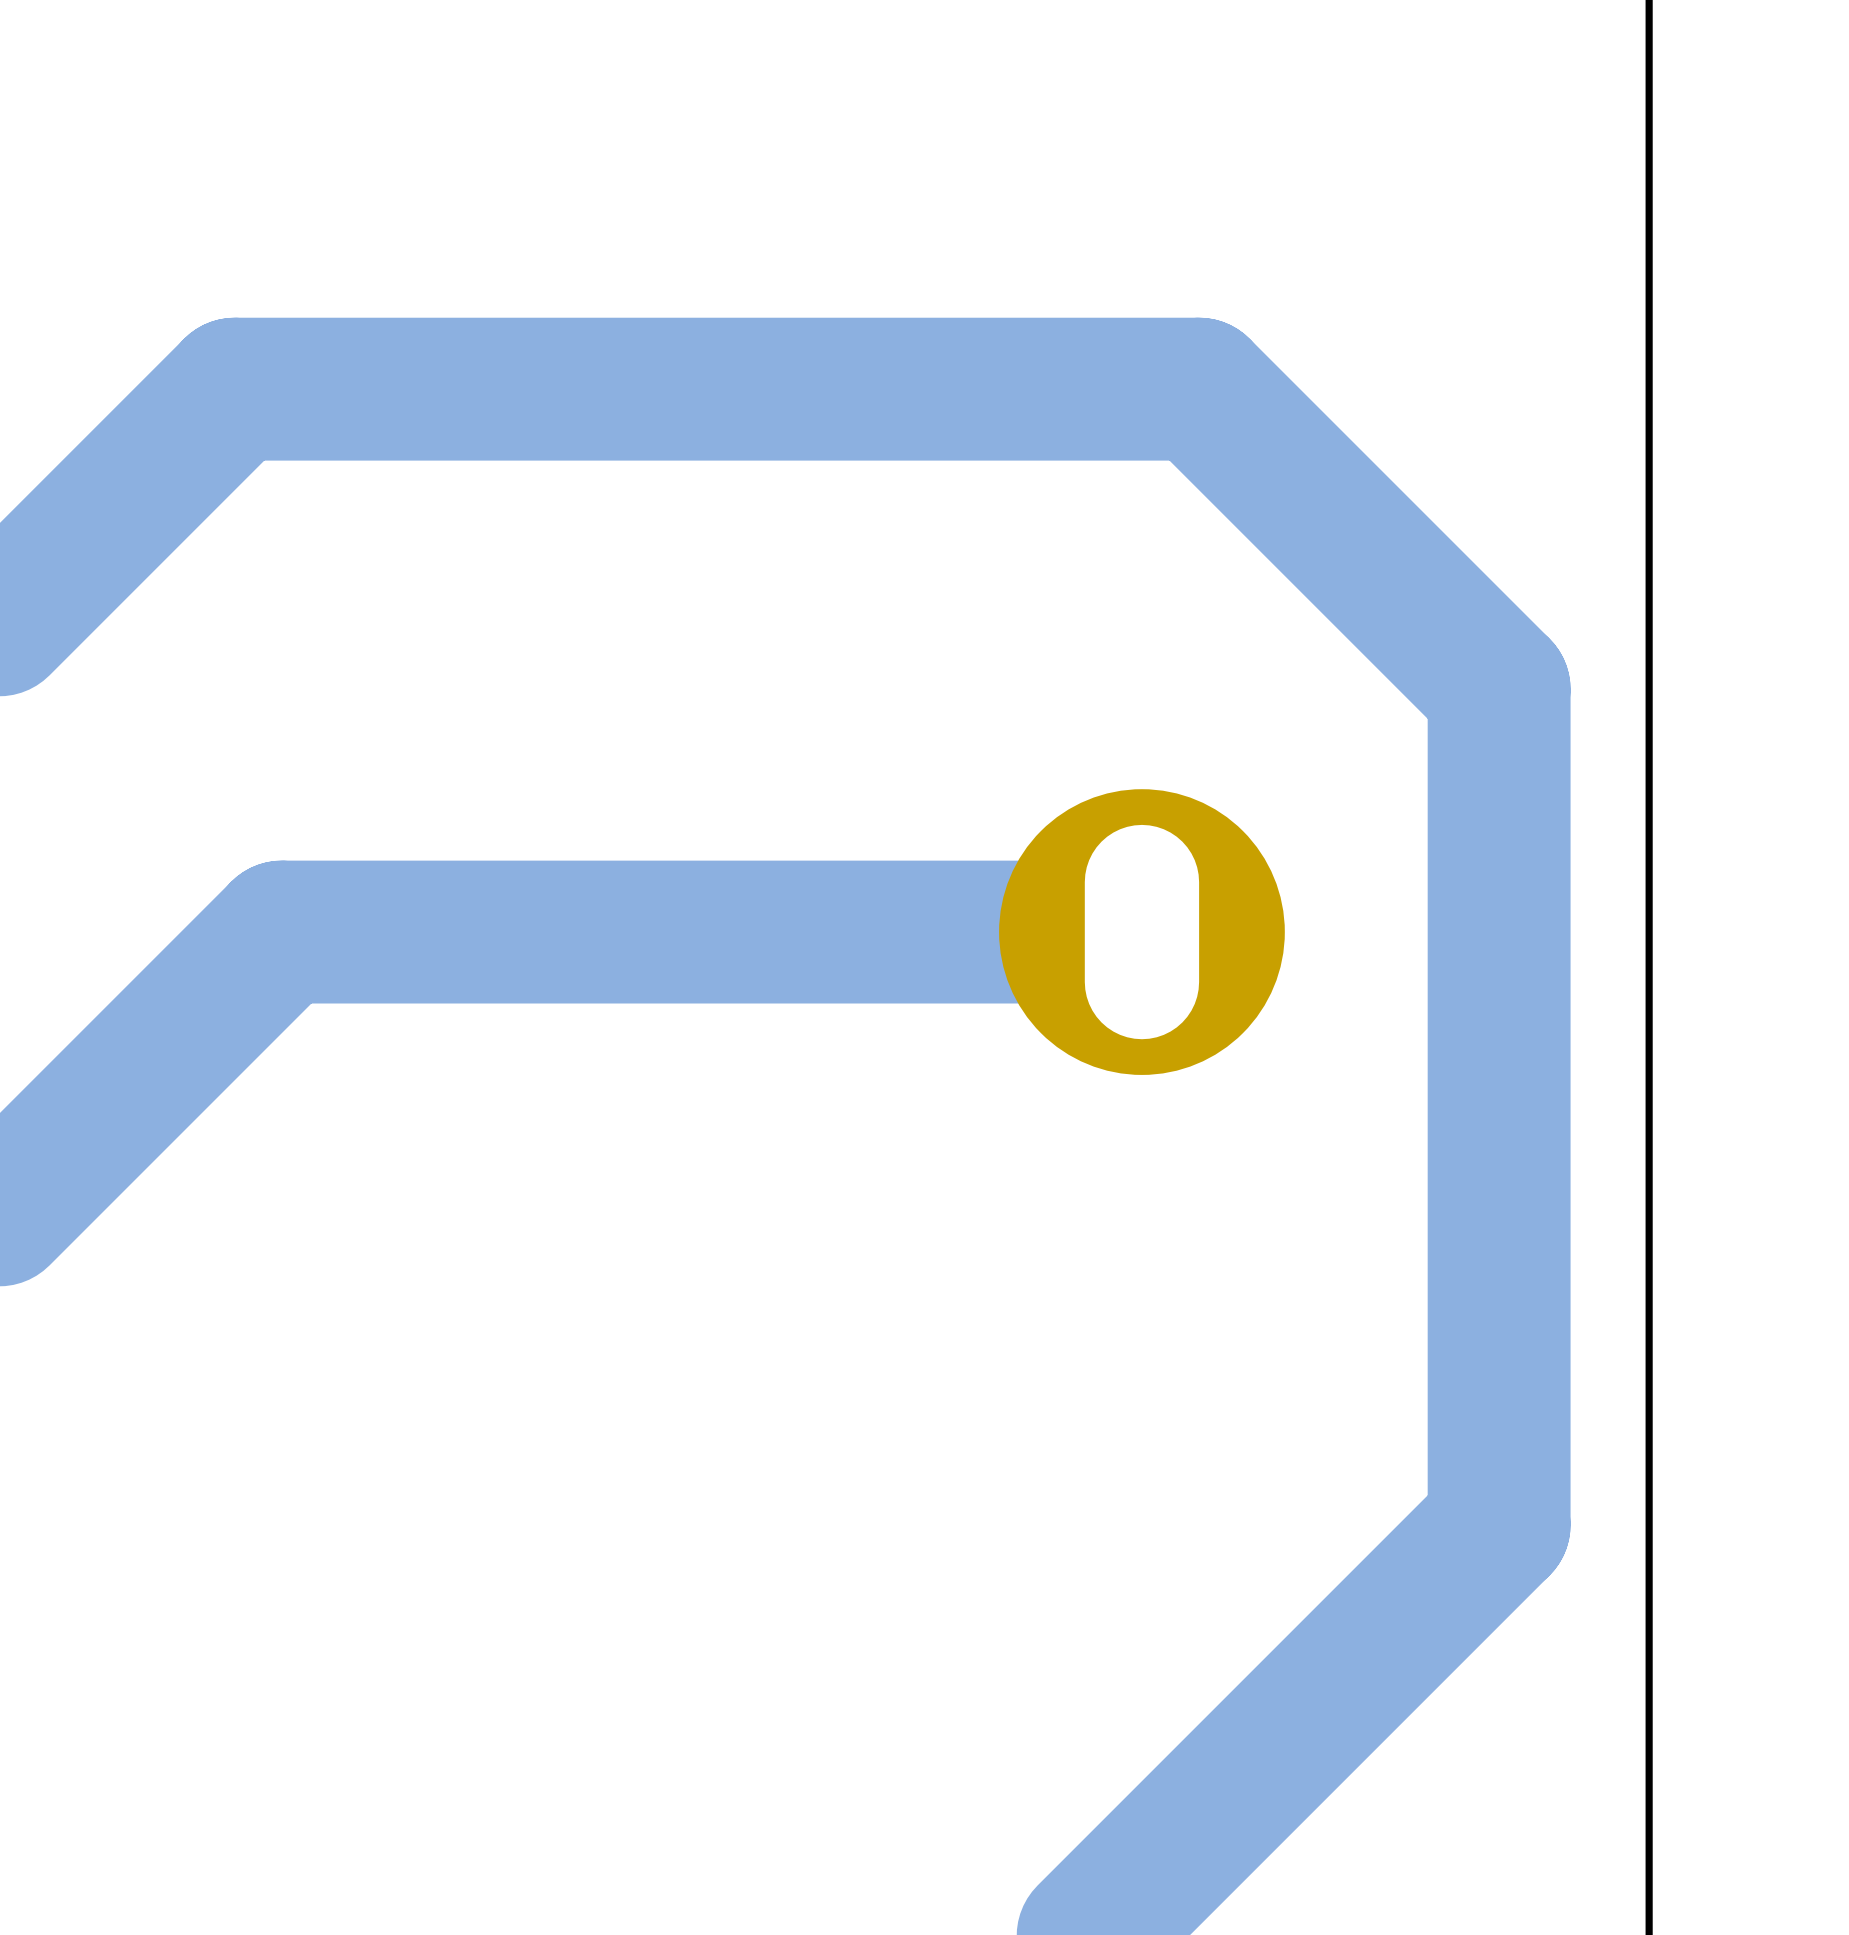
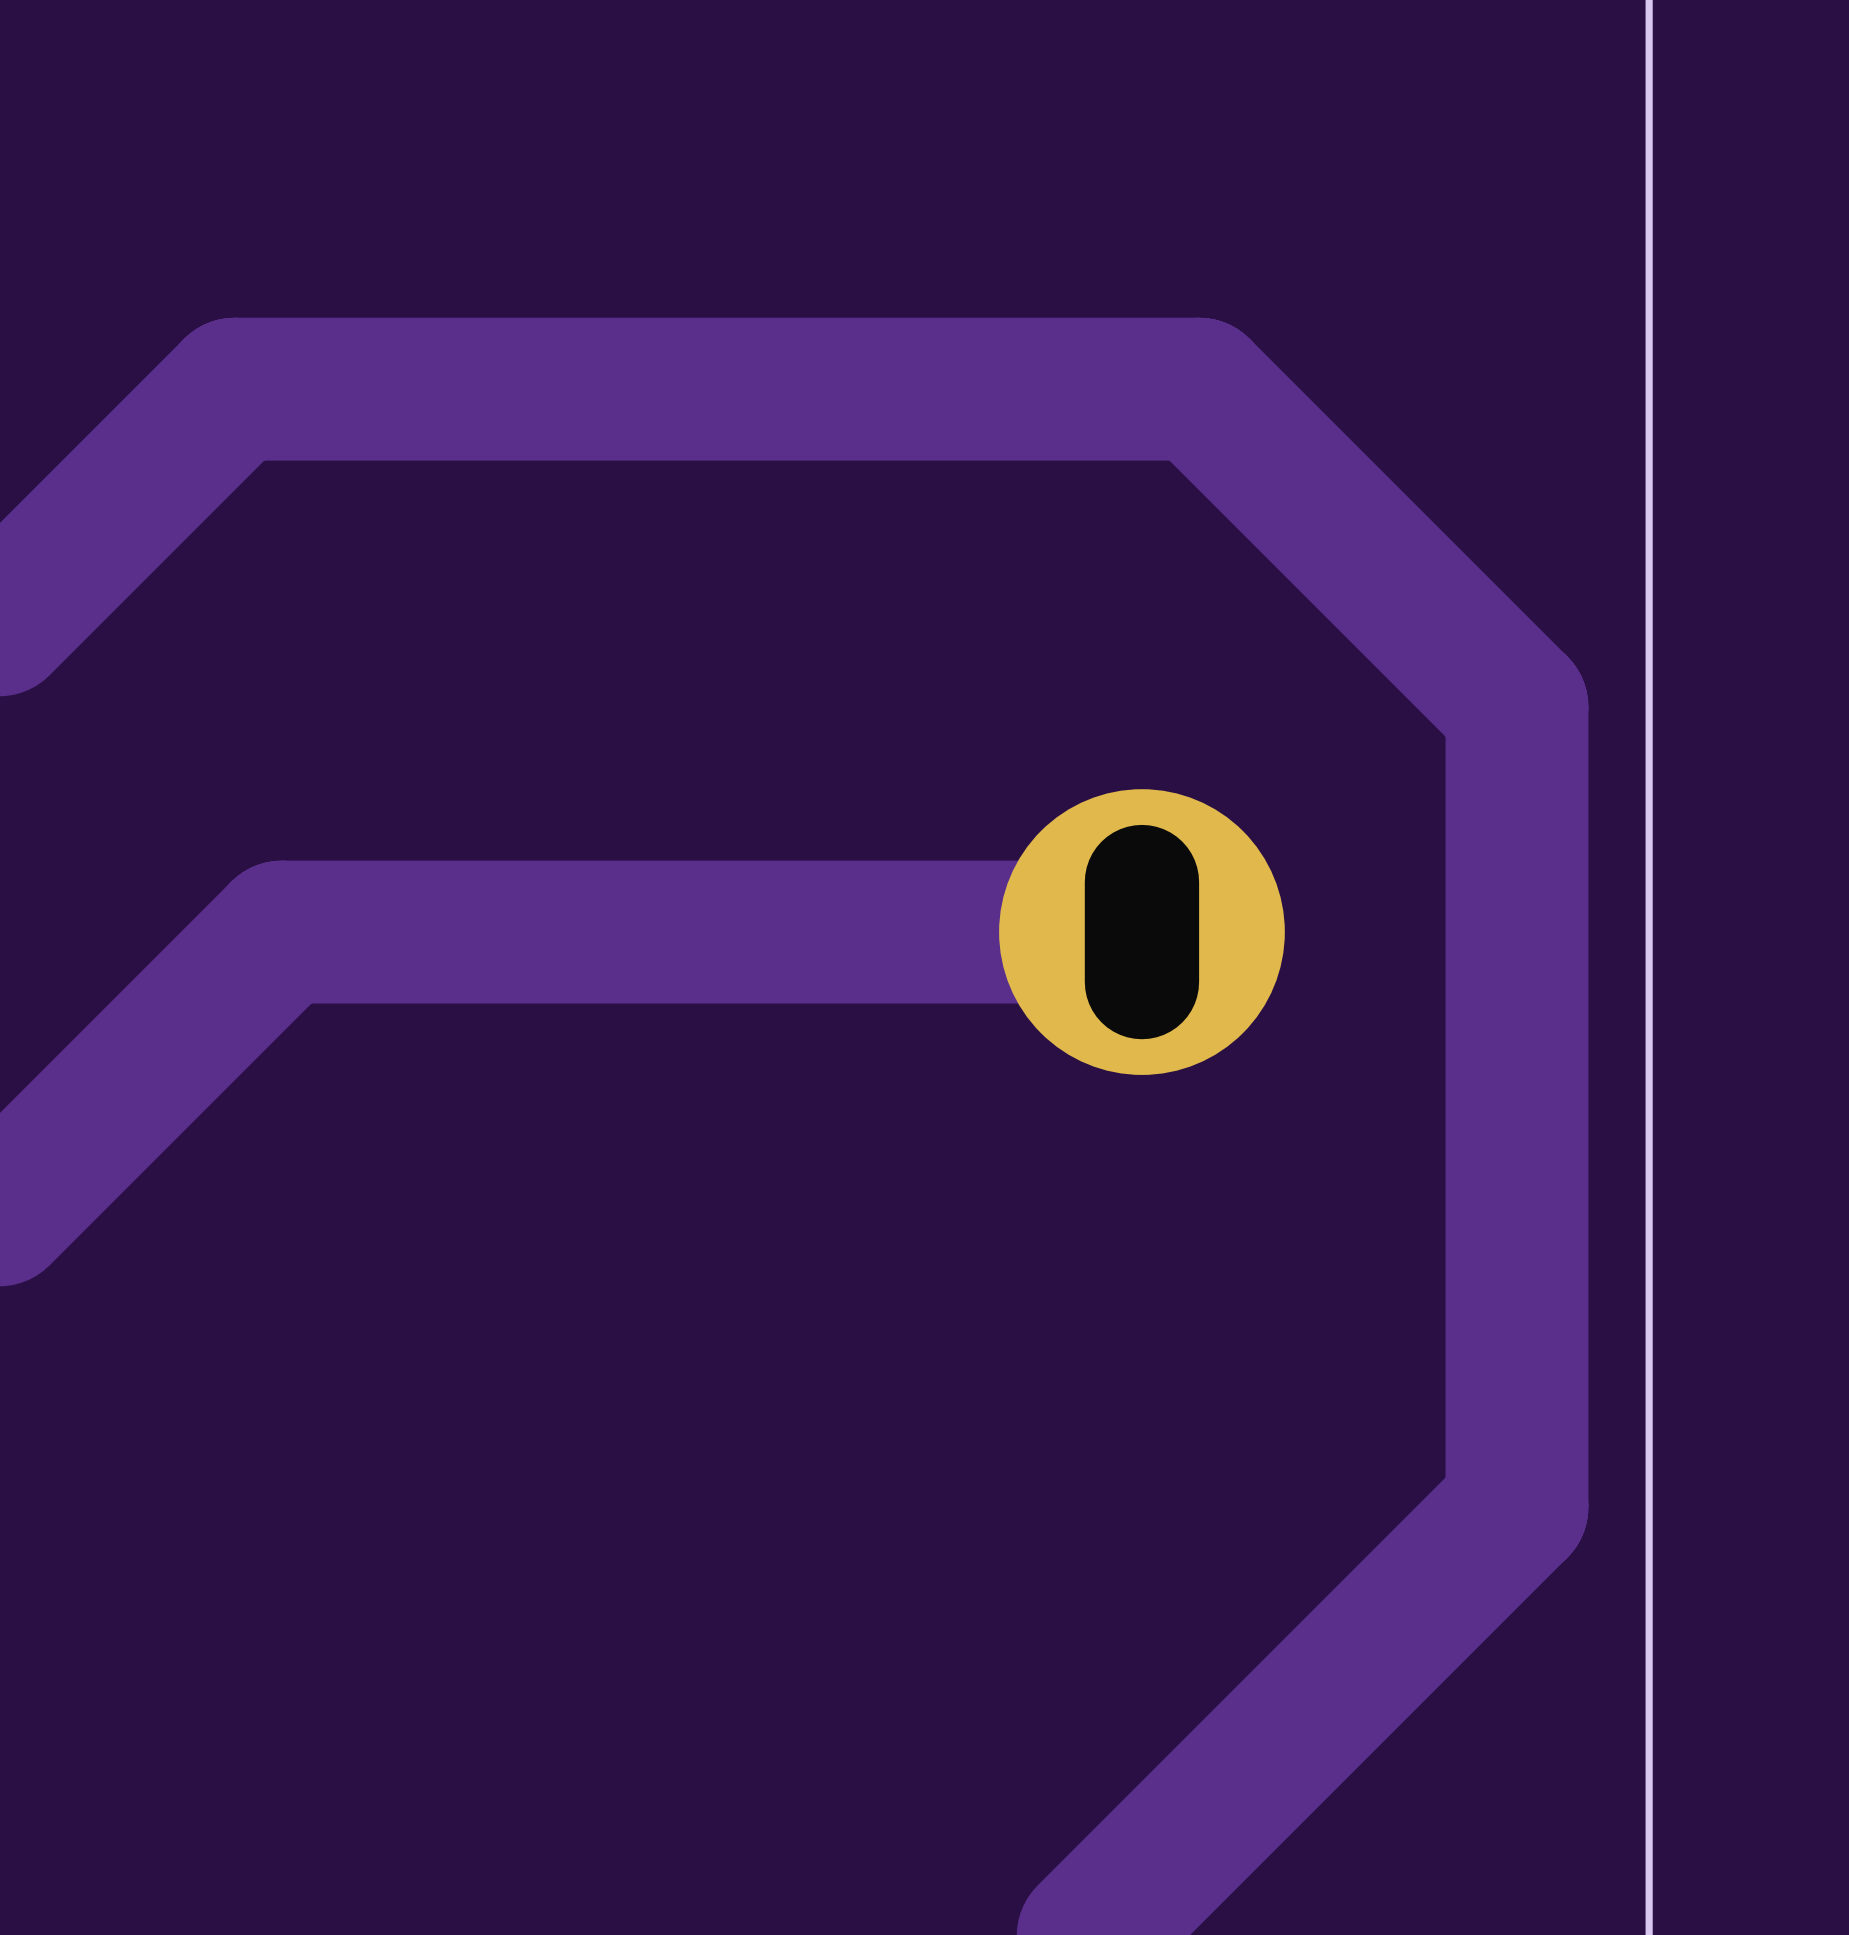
track: (1499, 689) (1499, 1524) -> (1499, 689) (1516, 707) (1516, 1507) (1499, 1524)

